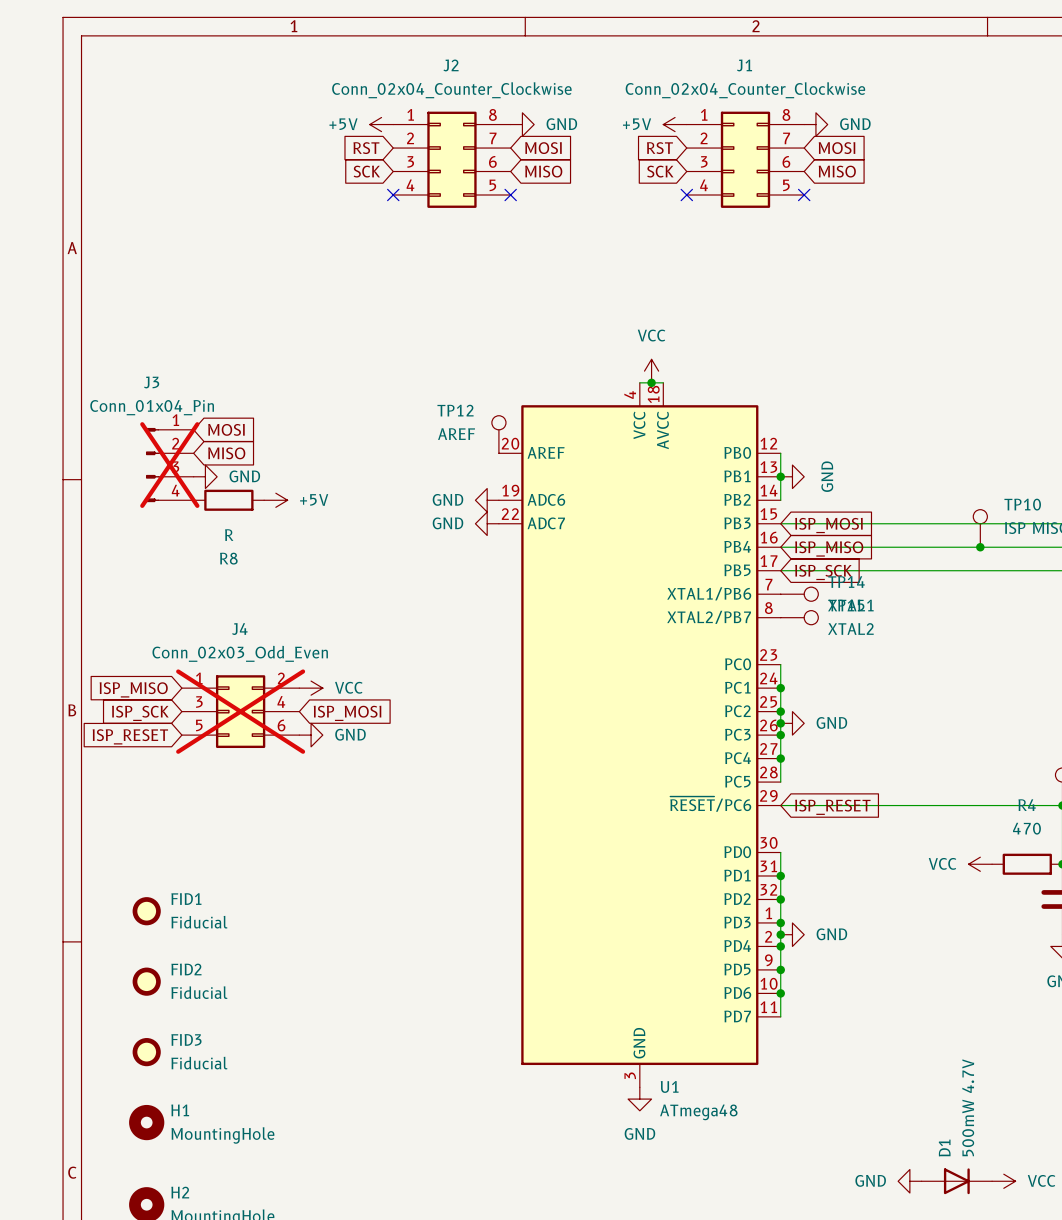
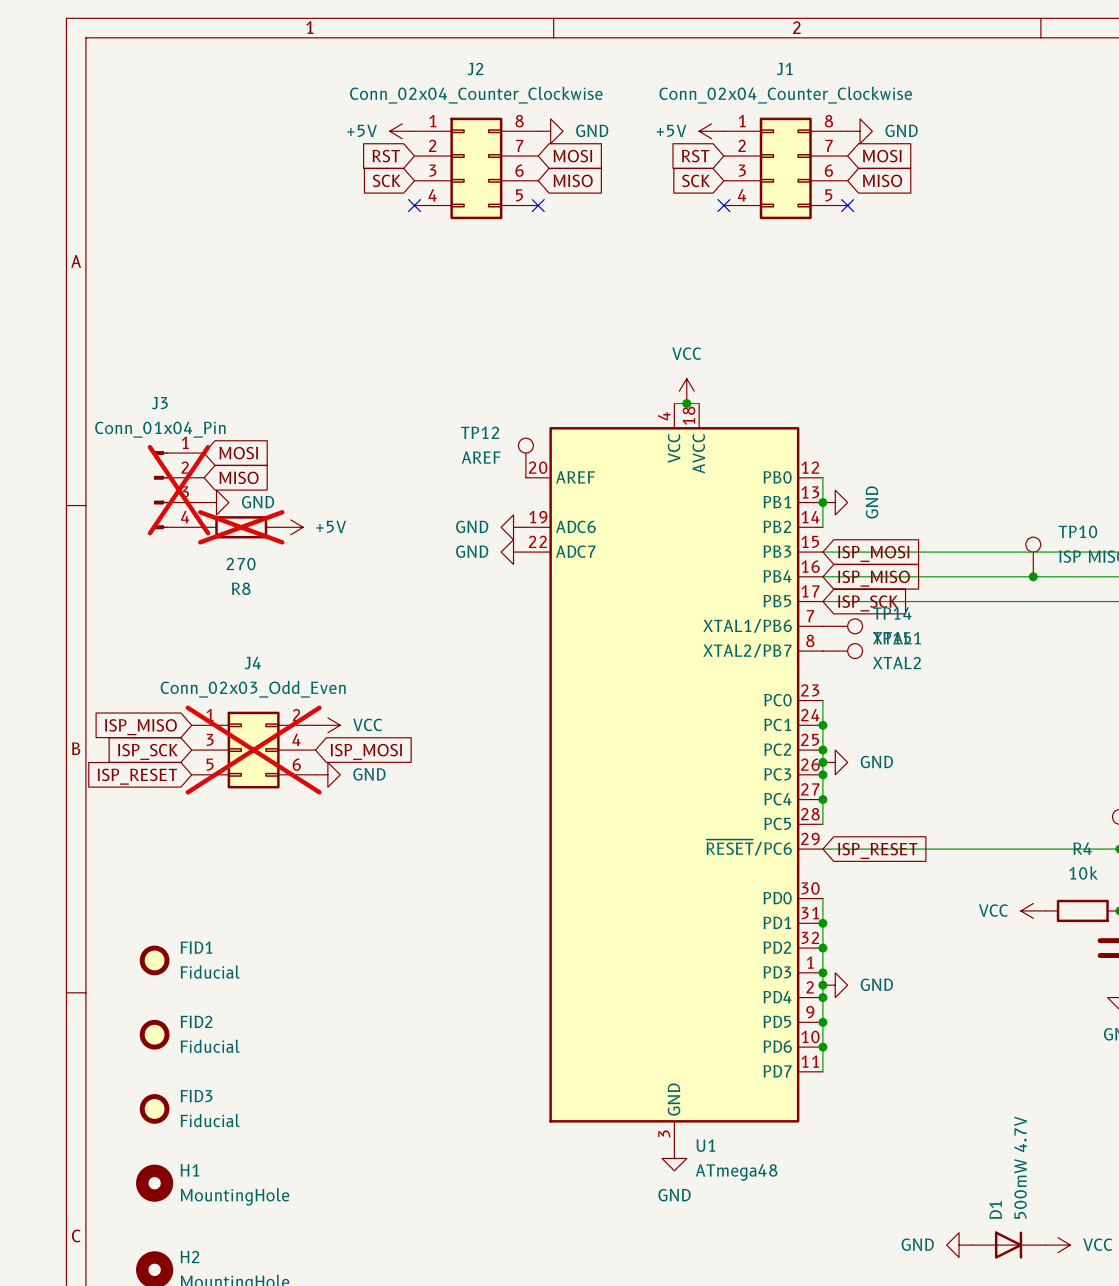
R8 do-not-place cross: none -> (241, 527)
R8 value: R (229, 535) -> 270 (241, 564)
R4 value: 470 (1026, 828) -> 10k (1083, 873)

